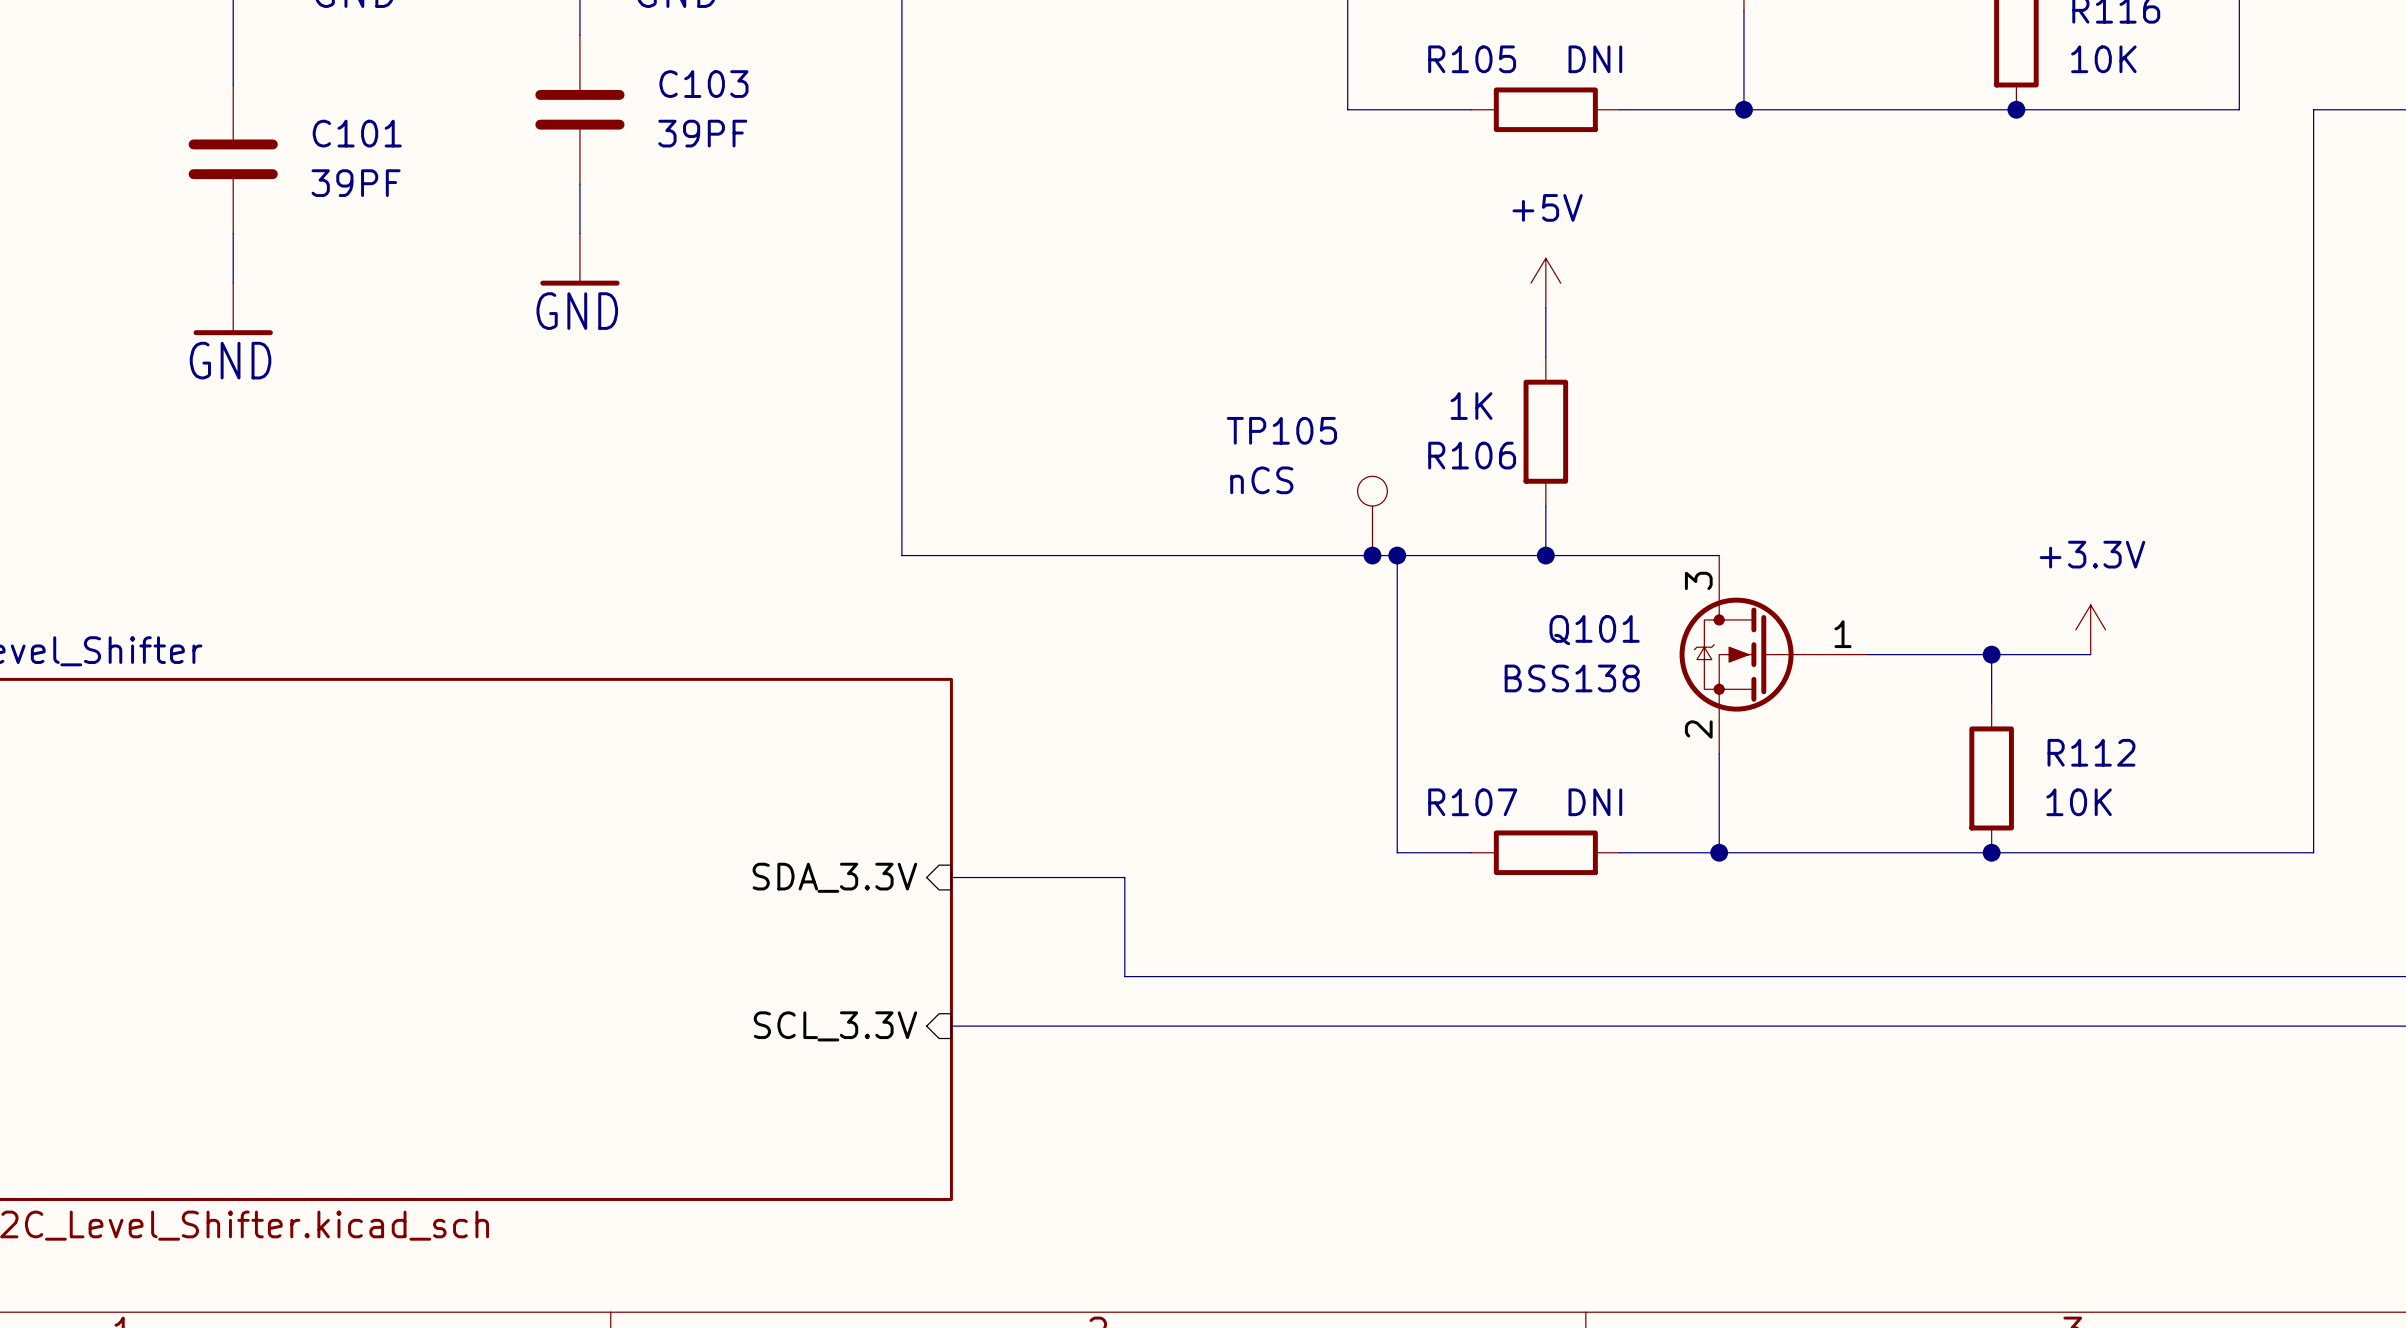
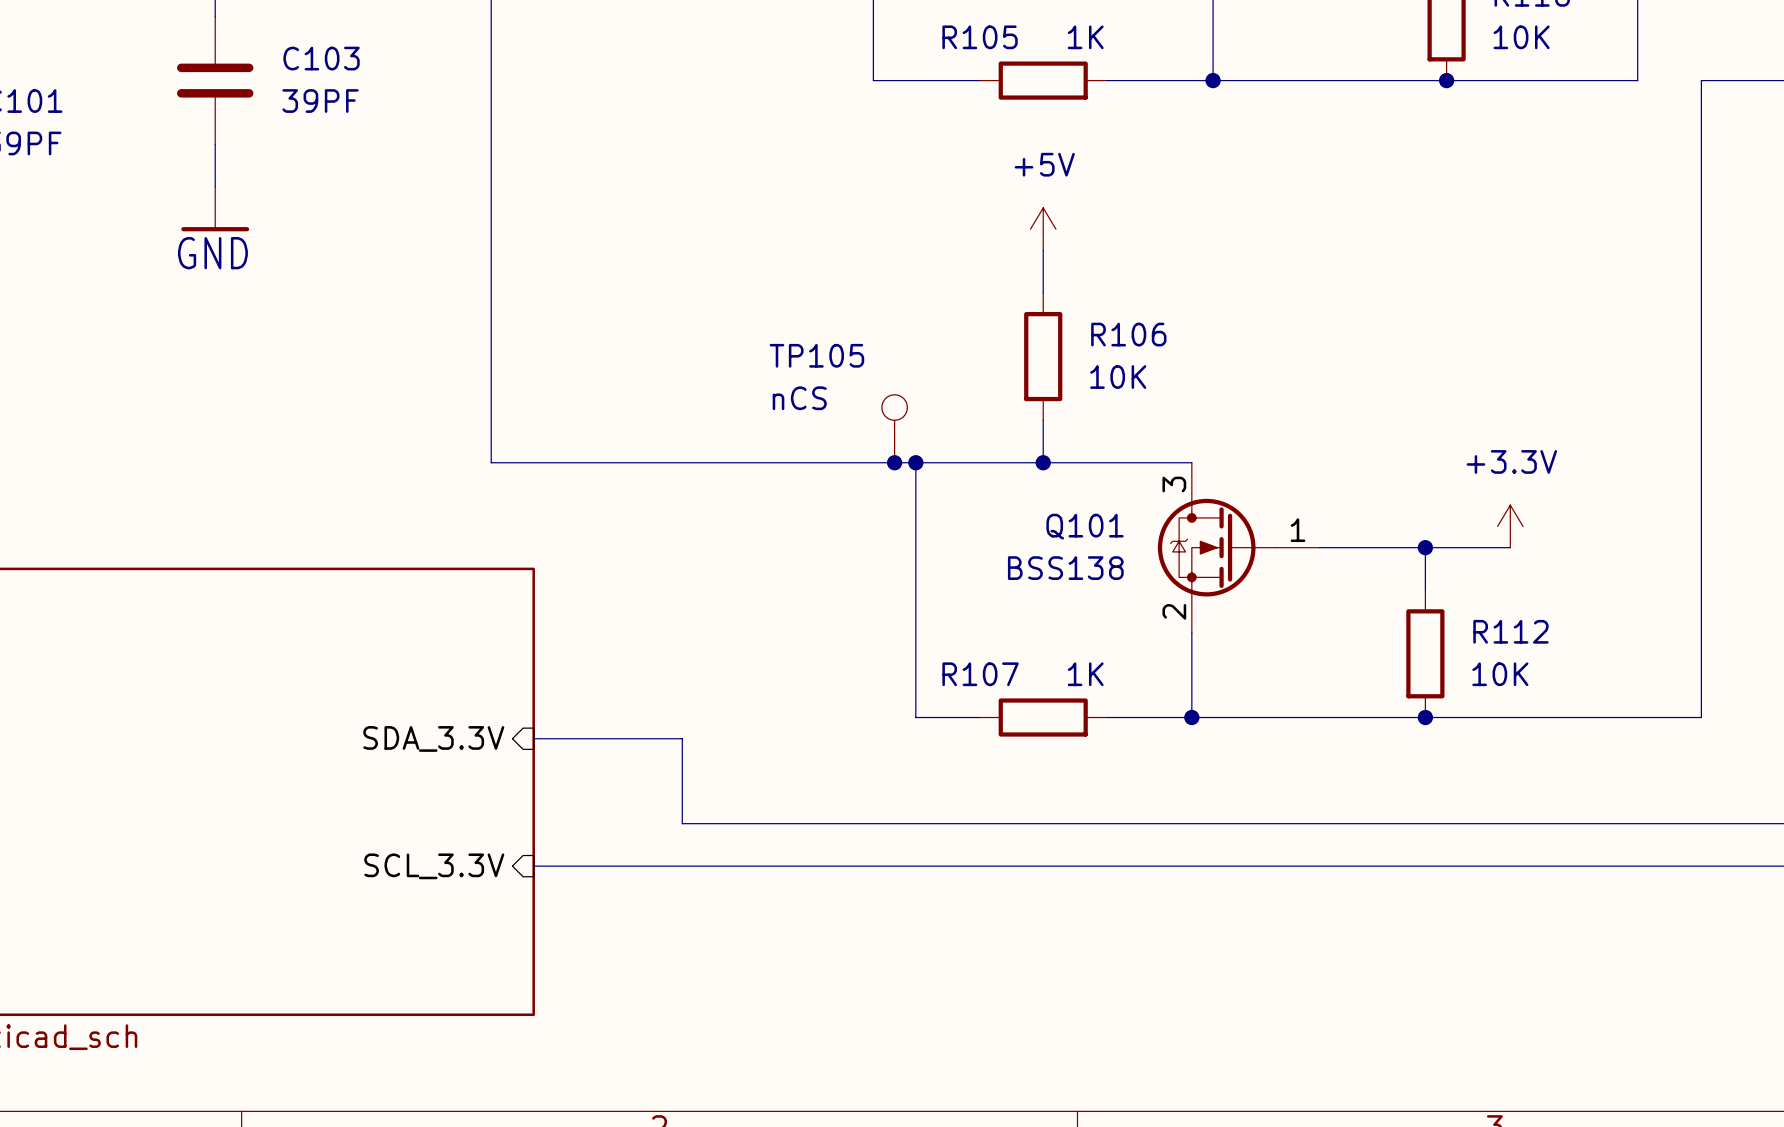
R105 value: DNI (1595, 59) -> 1K (1085, 37)
R106 value: 1K (1471, 406) -> 10K (1118, 377)
R106 name position: R106 (1472, 455) -> R106 (1128, 334)
R107 value: DNI (1595, 802) -> 1K (1085, 674)

